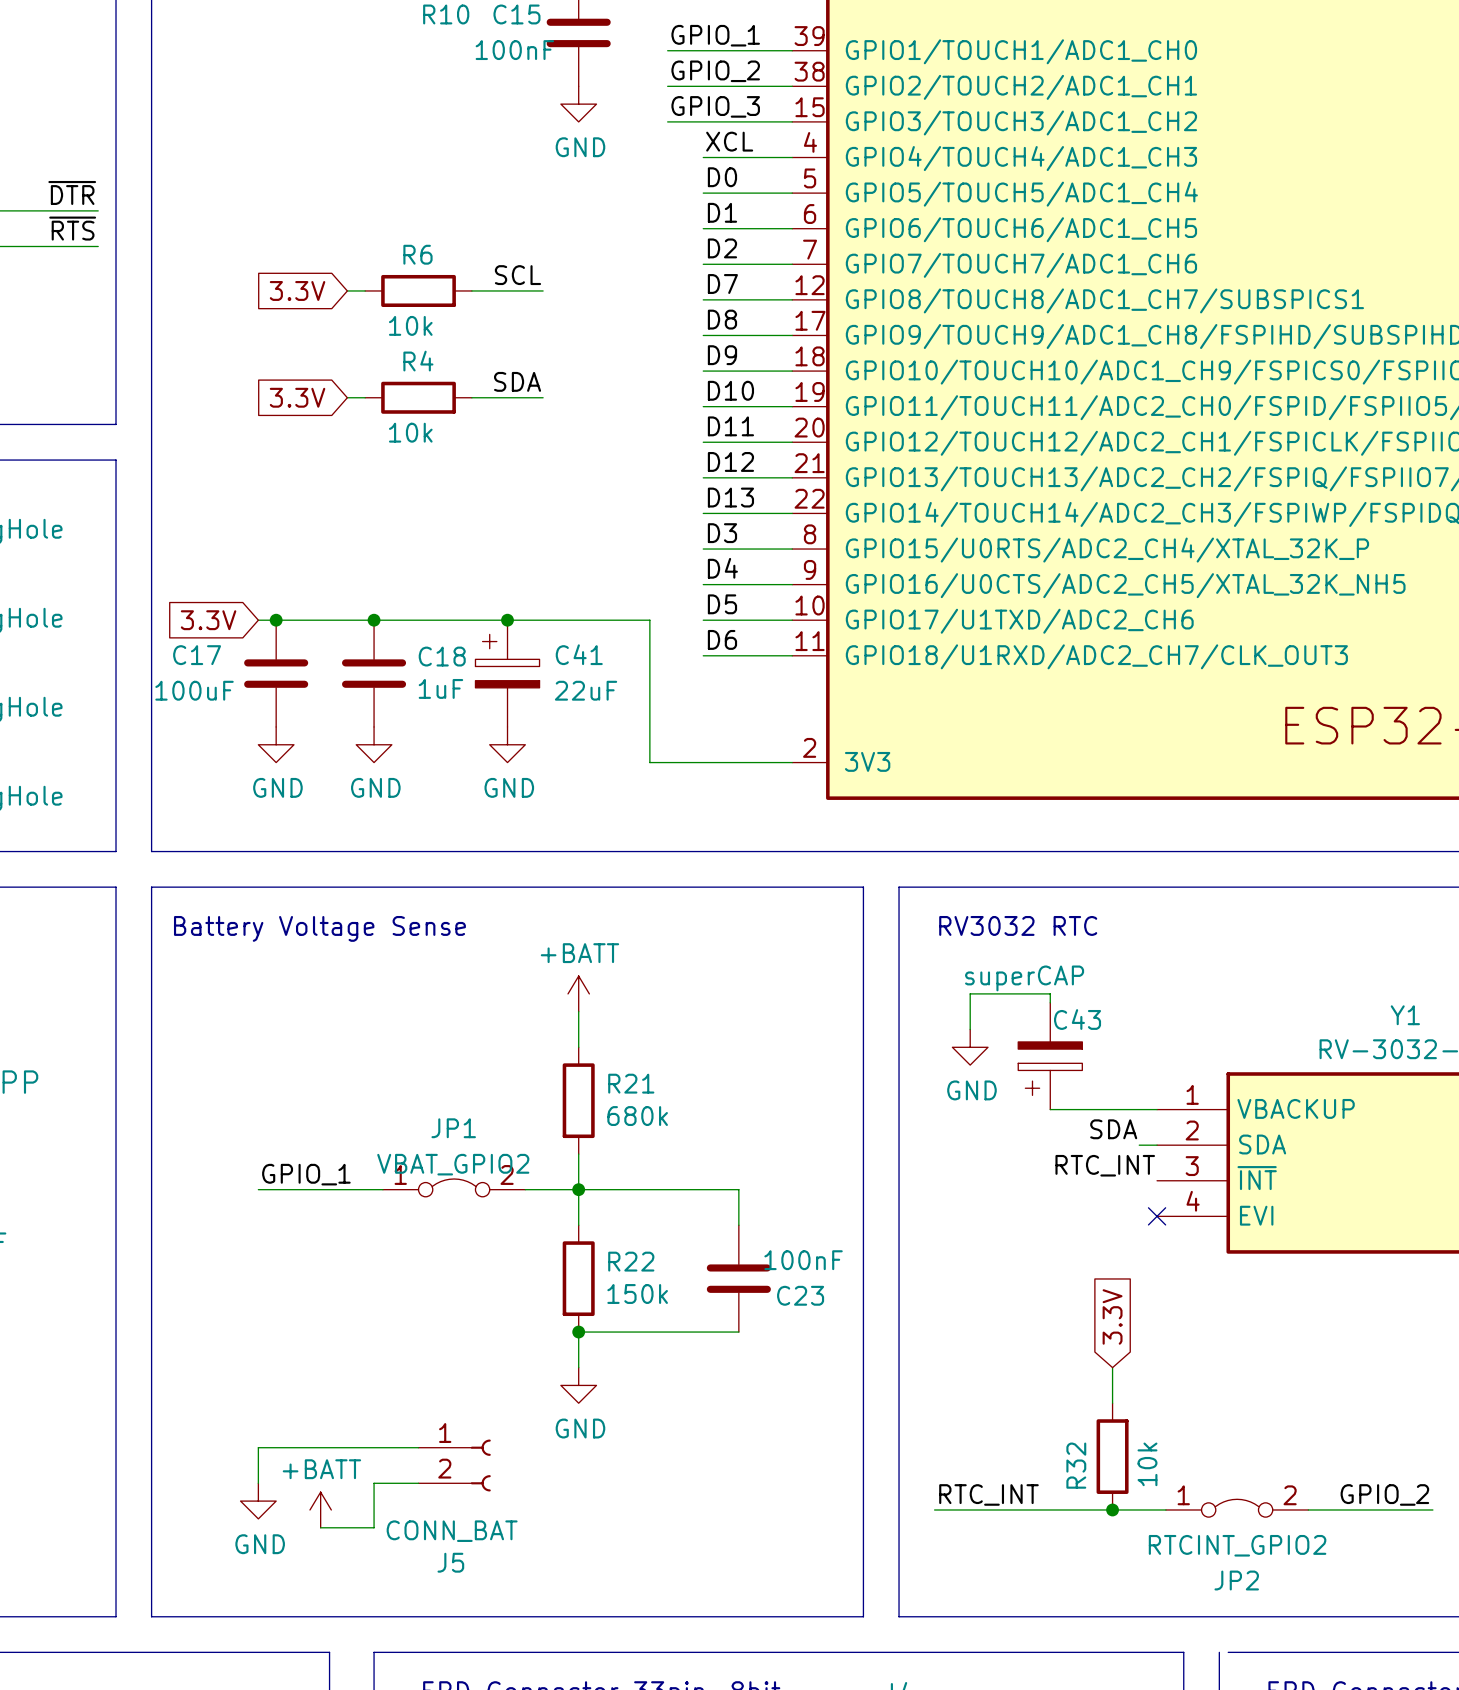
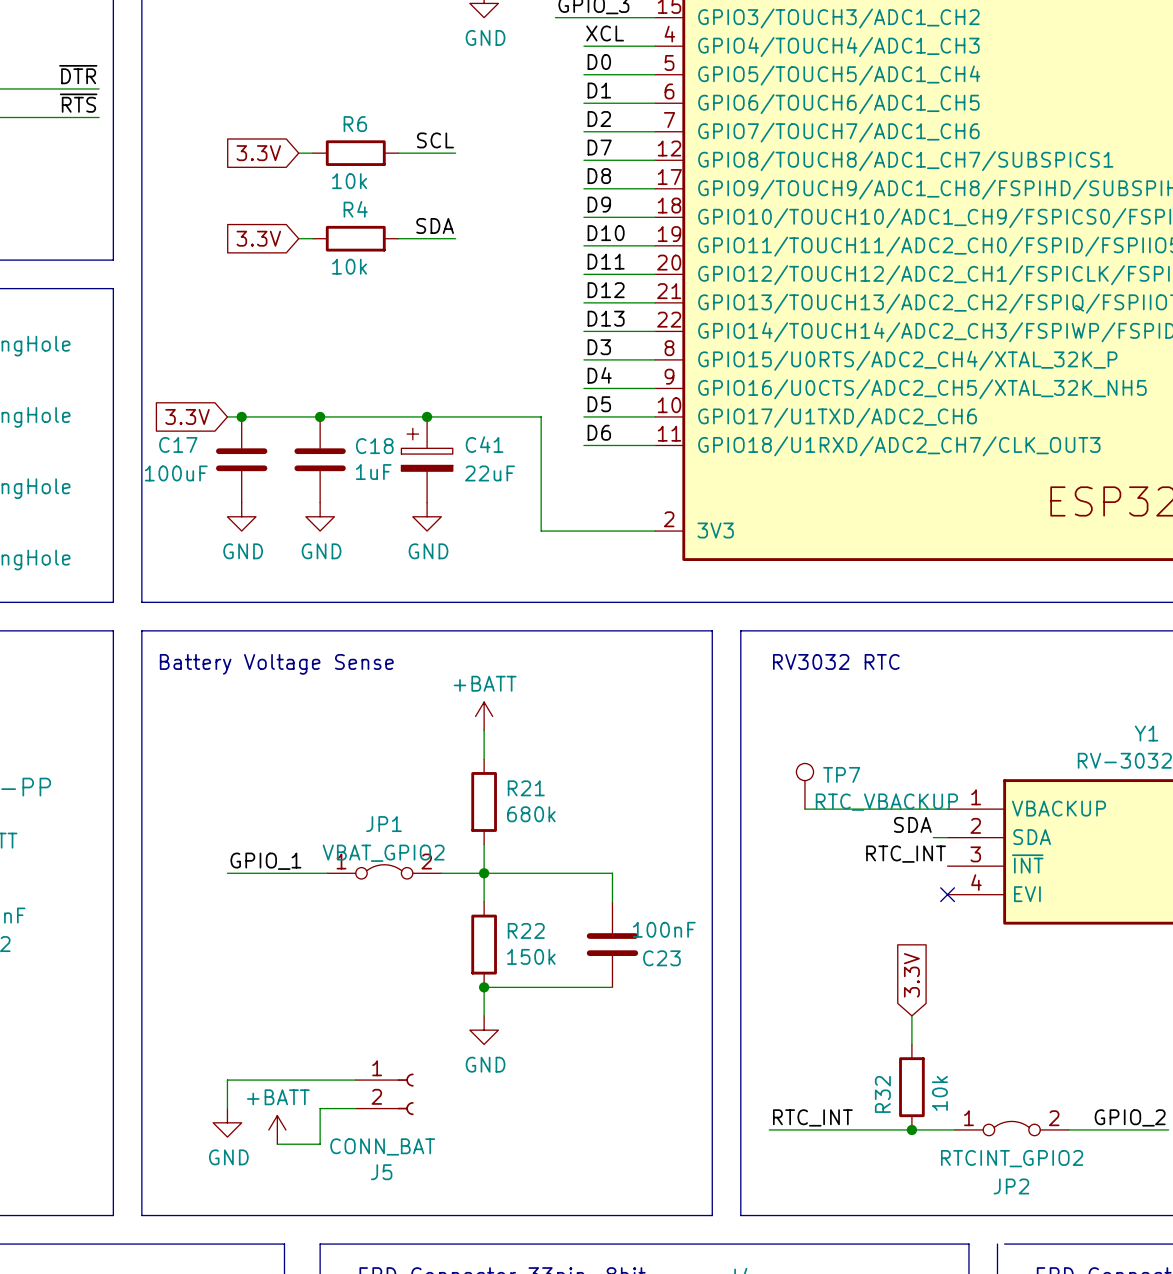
wire: (1050, 1002) (1050, 993) (970, 993) (970, 1029) -> none
power symbol: GND (970, 1047) -> none
C43: superCAP (1050, 1056) -> none
TP7: none -> RTC_VBACKUP (804, 786)
wire: none -> (804, 809) (862, 809)

